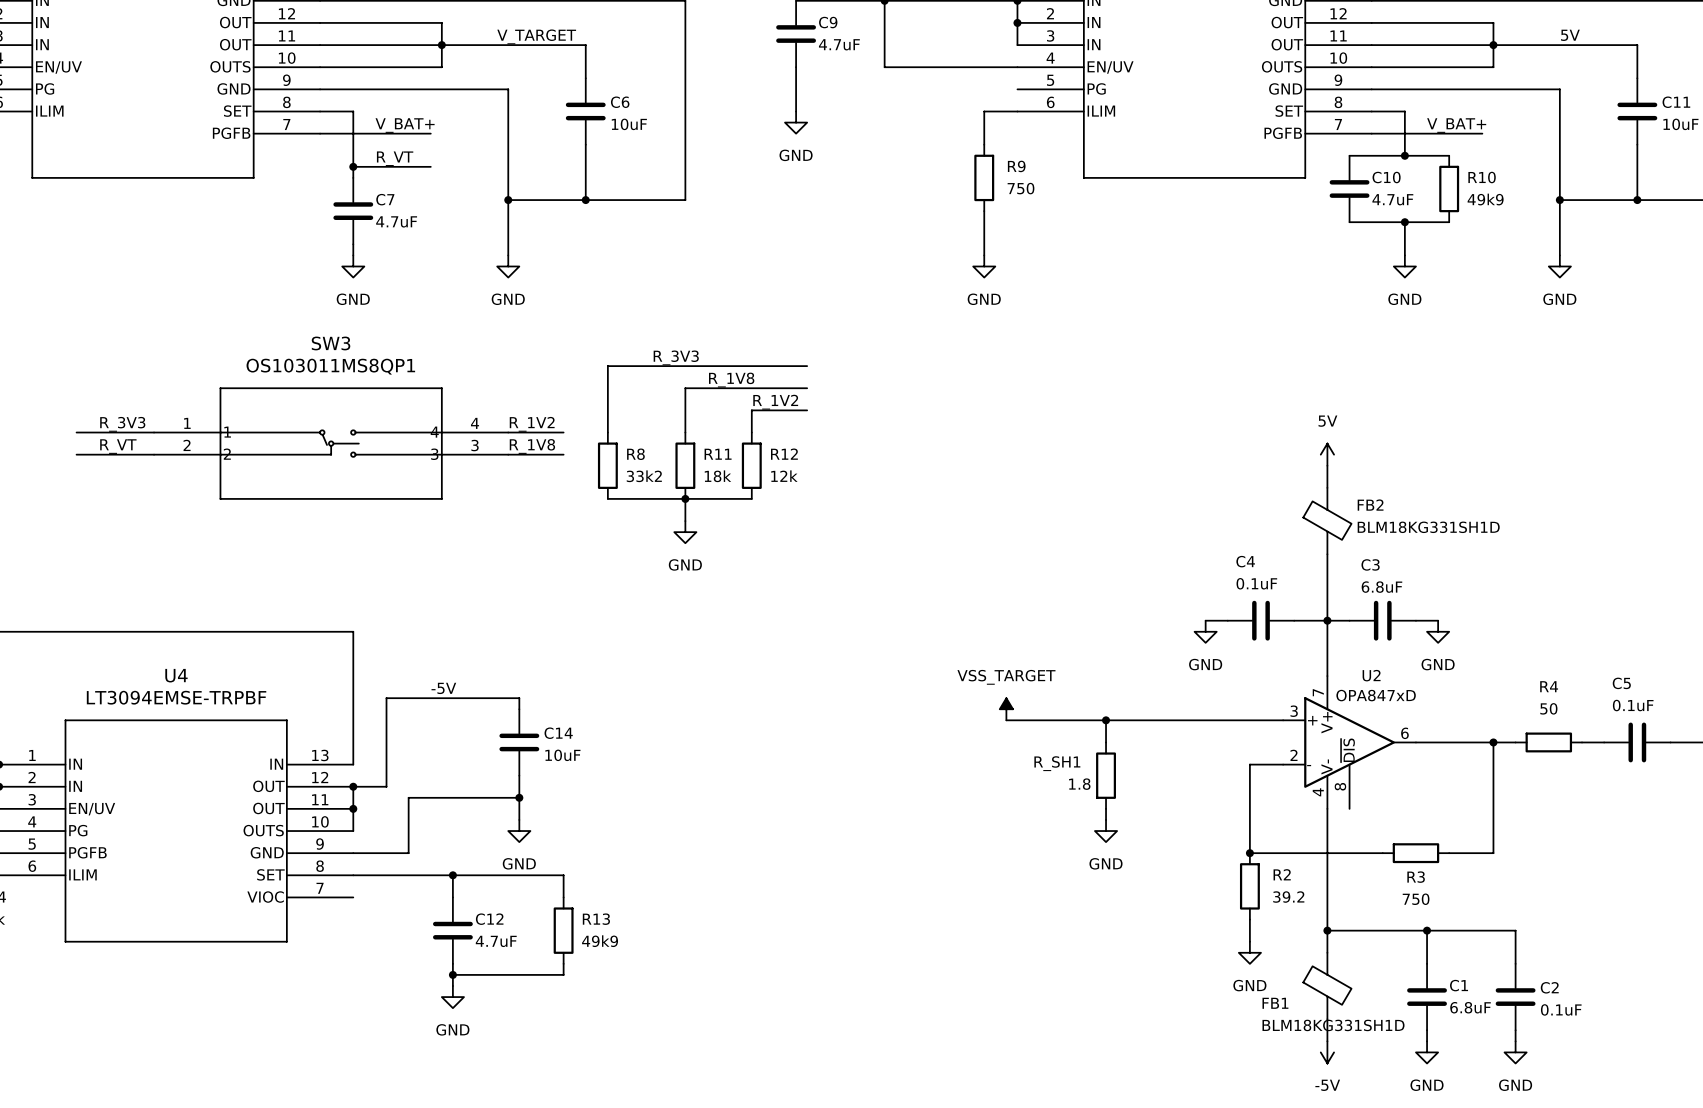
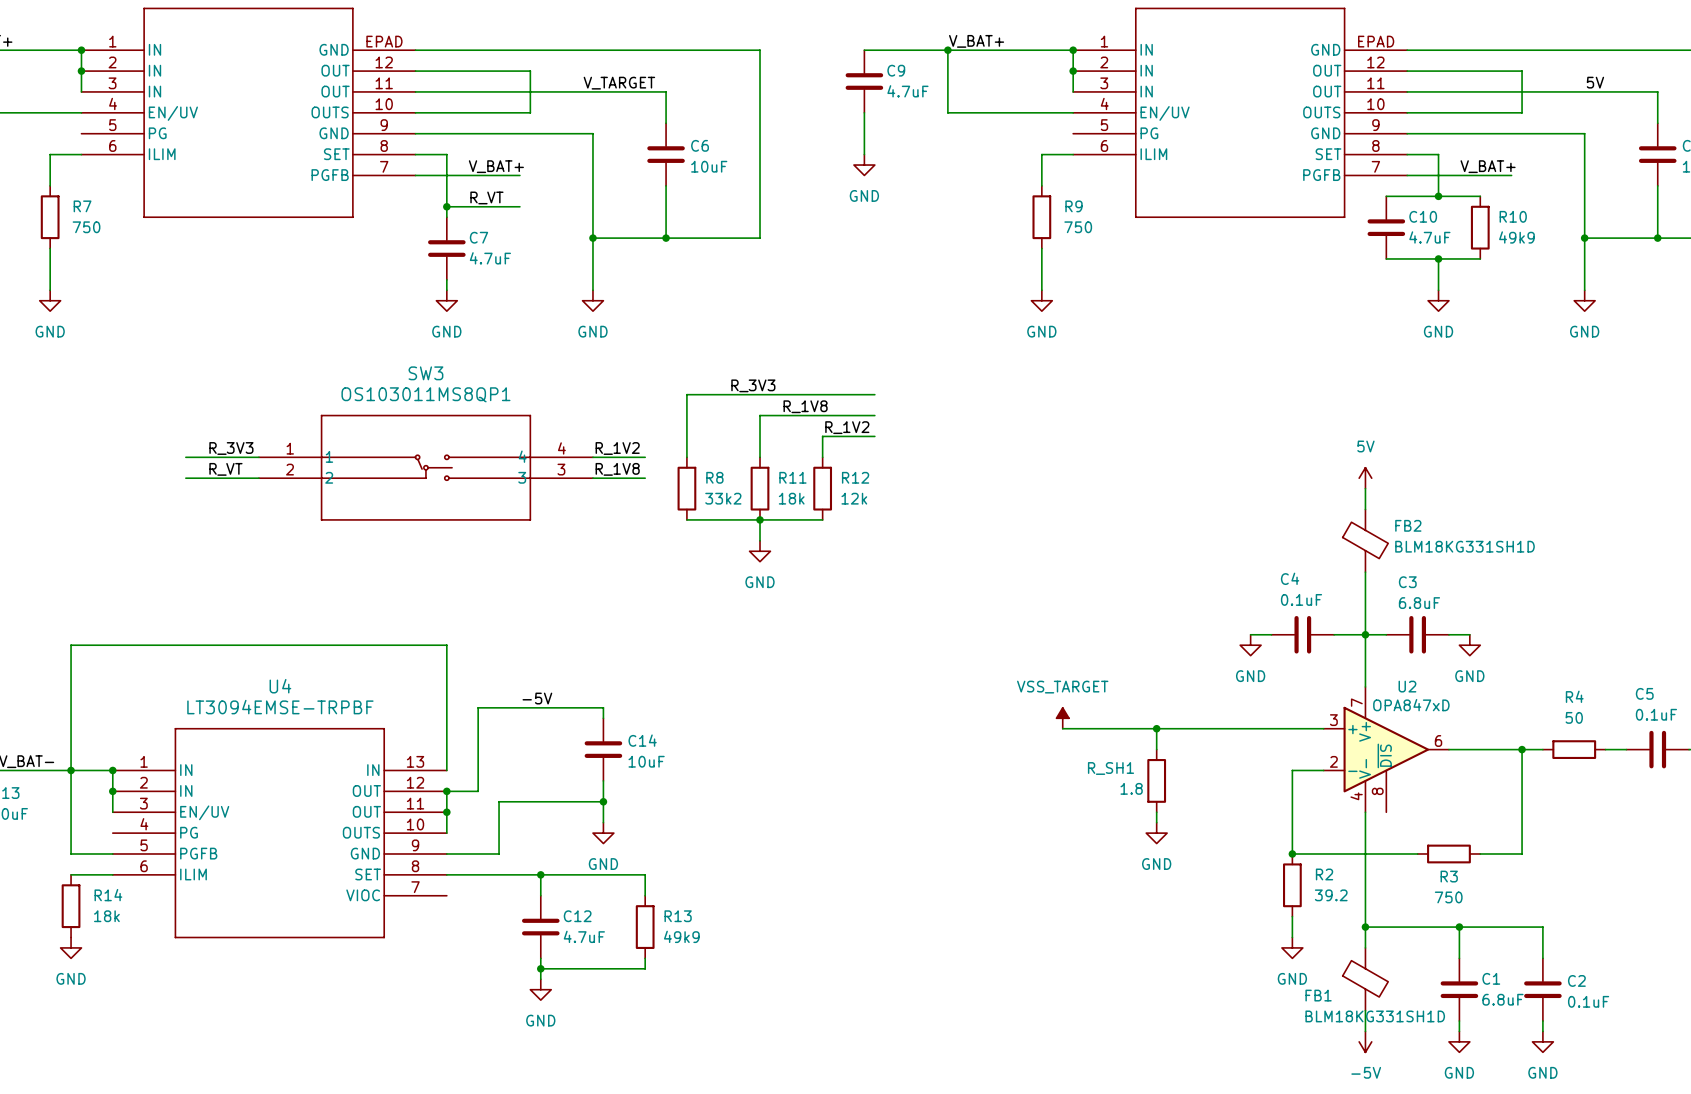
junction: (441, 45) -> none
junction: (1493, 45) -> none

